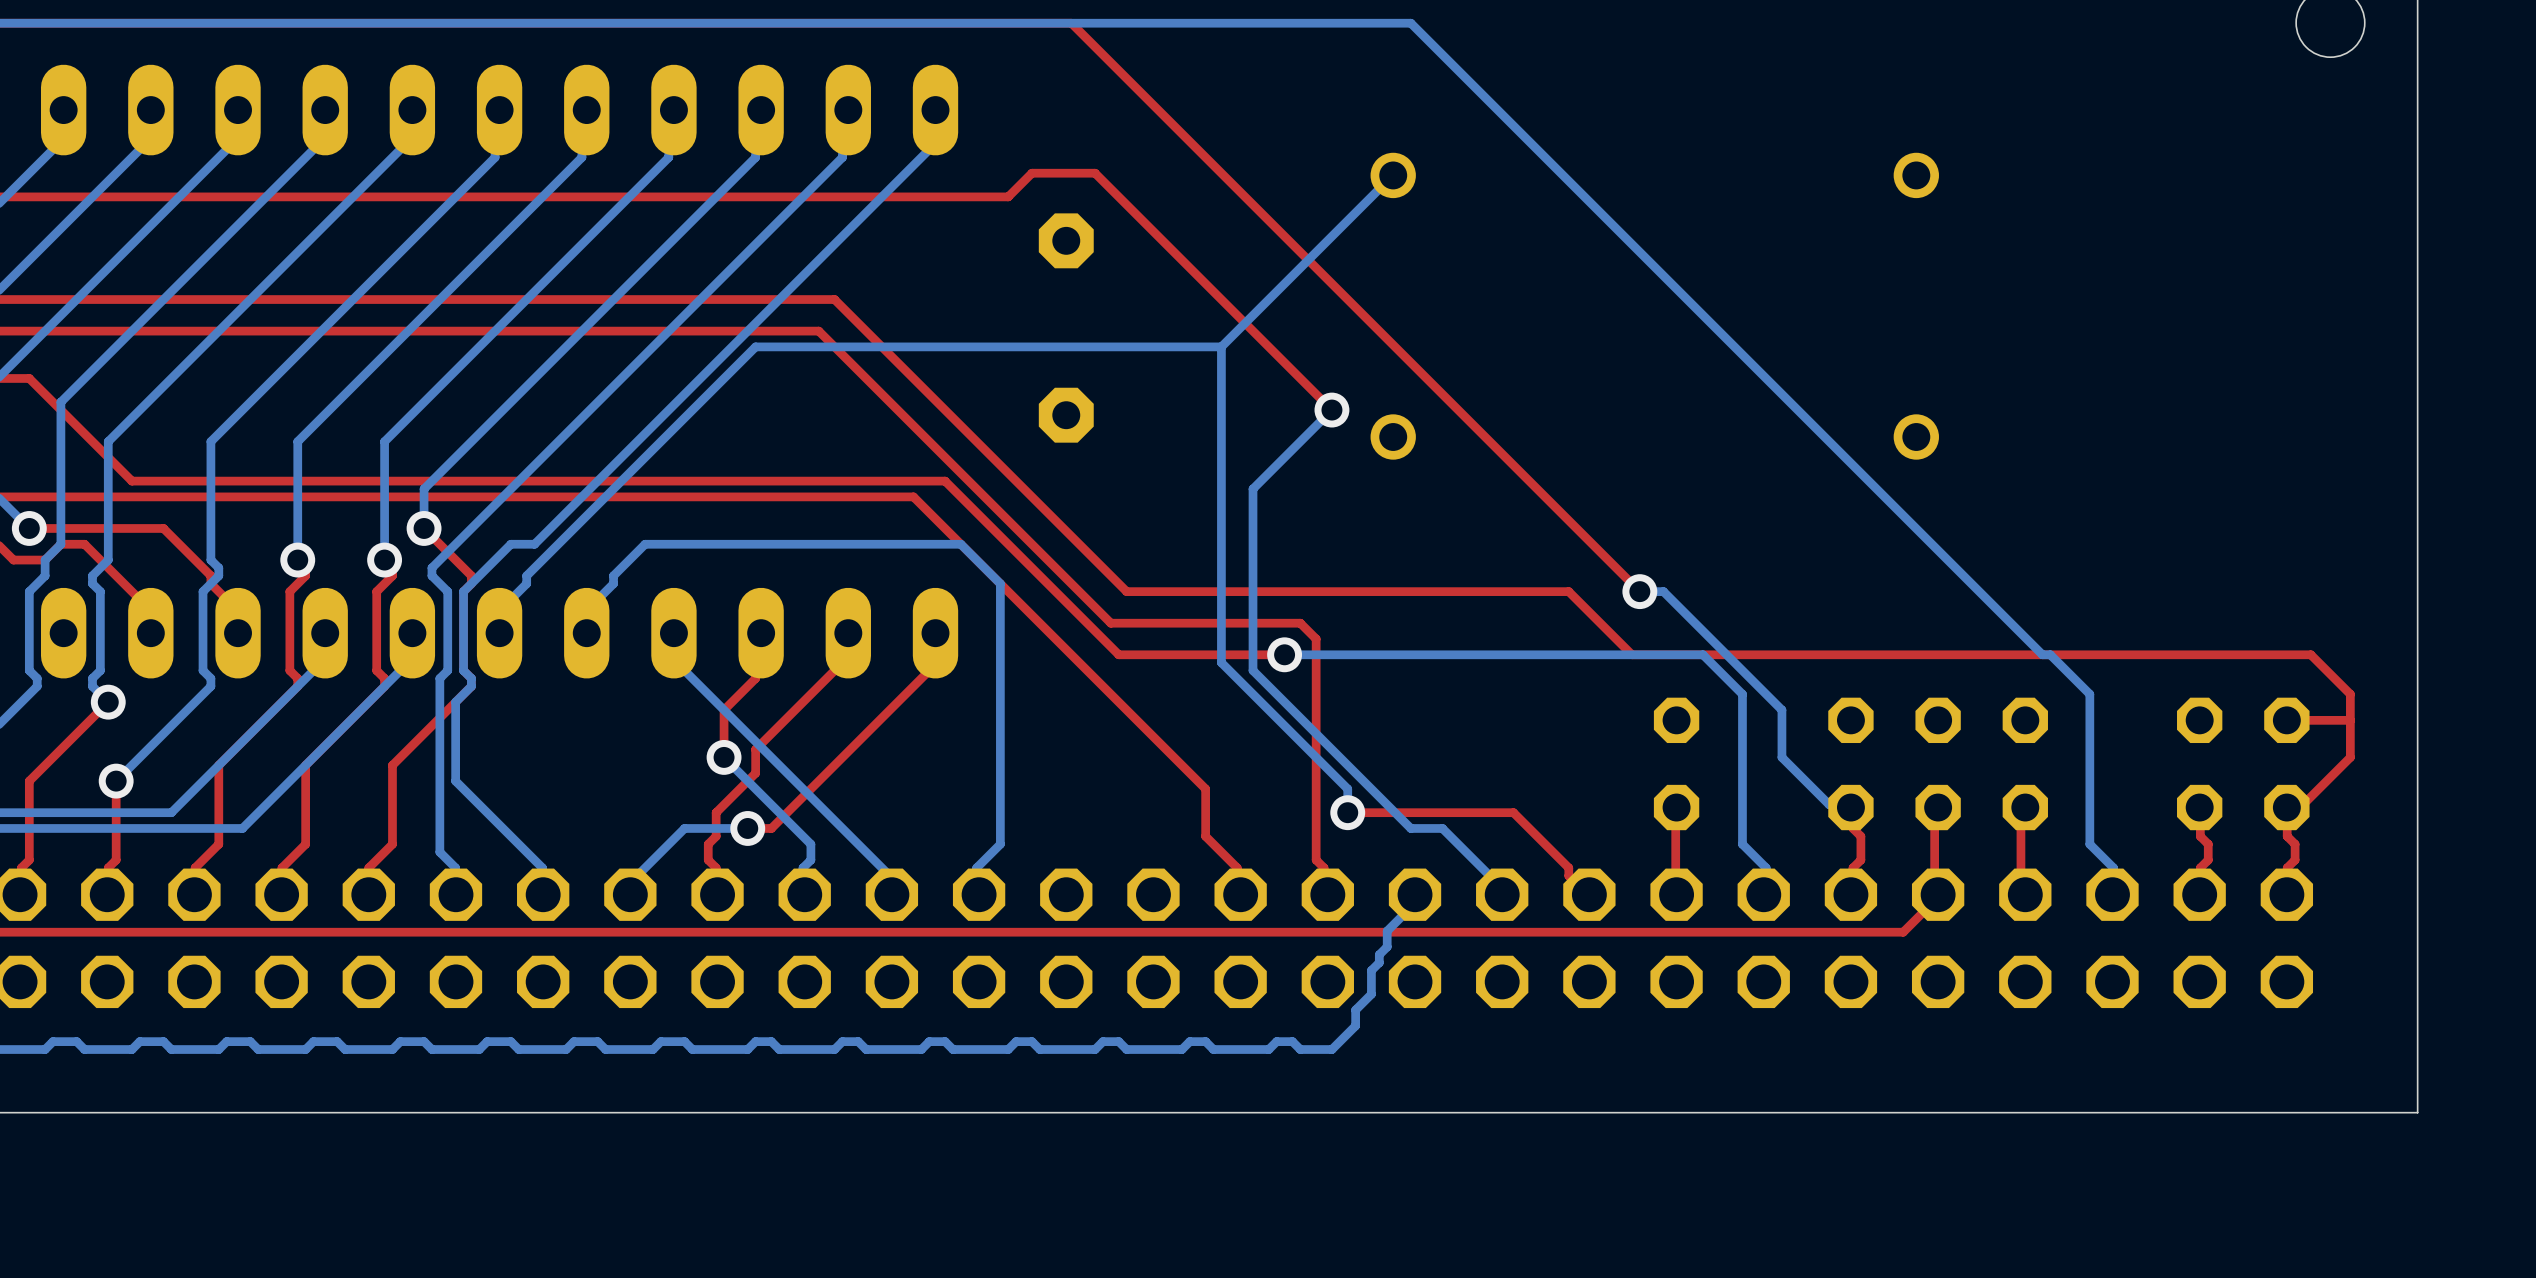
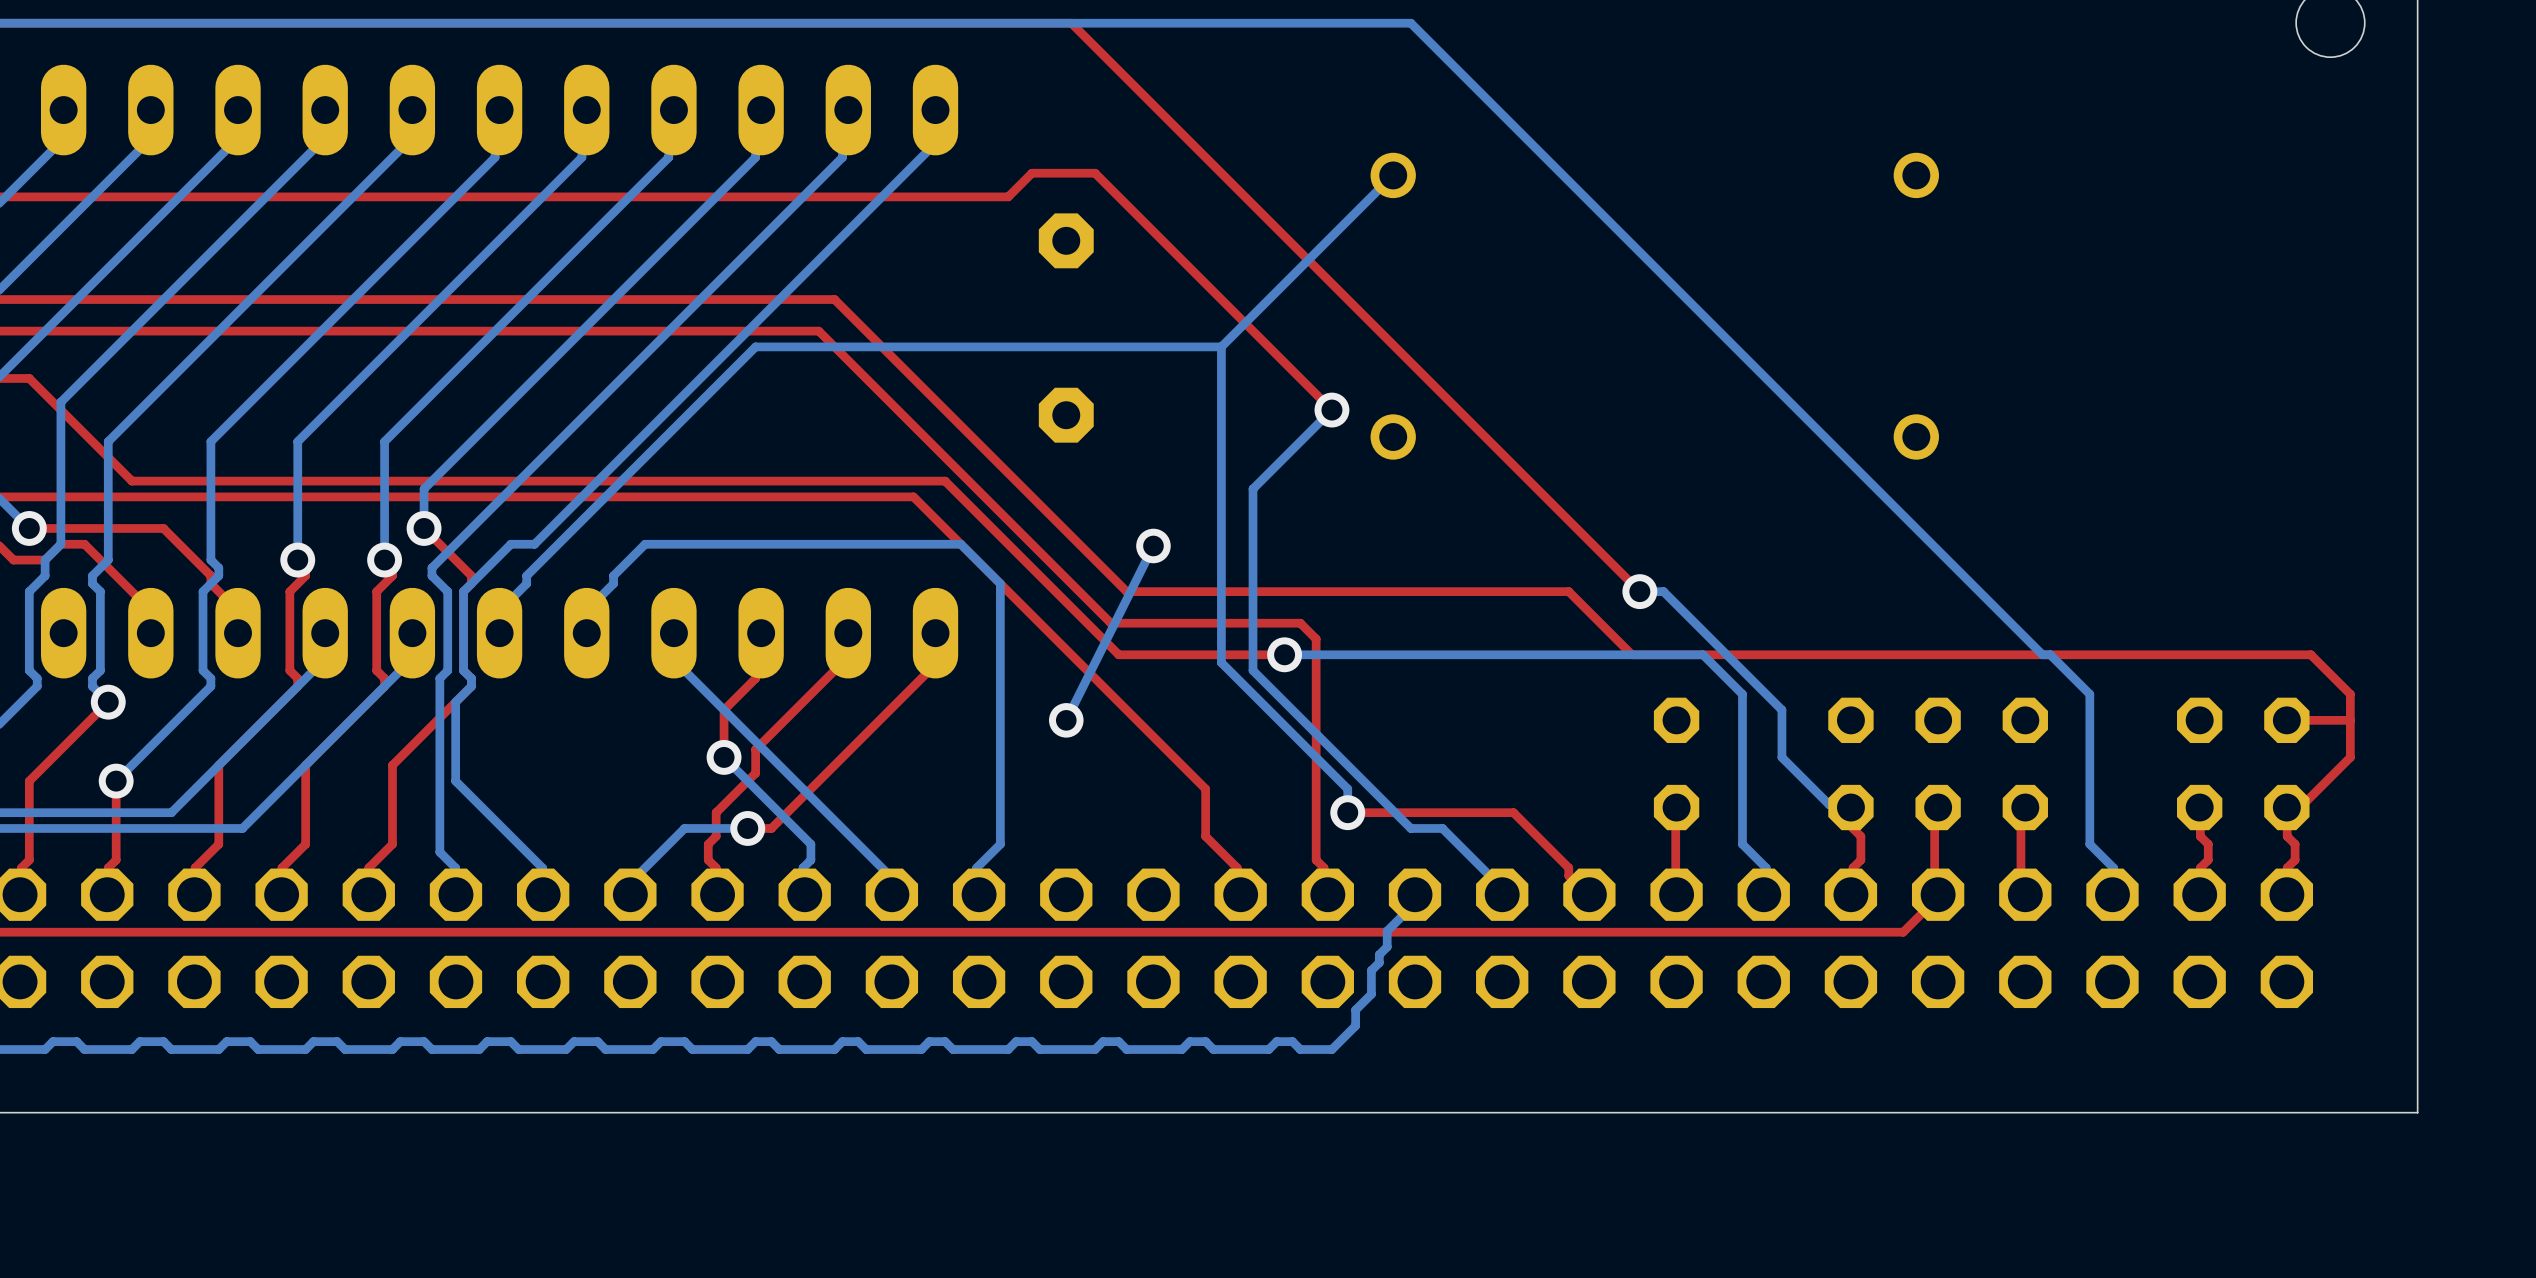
bottom track: none -> (1153, 545) (1066, 720)
via: none -> (1153, 545)
via: none -> (1066, 720)

